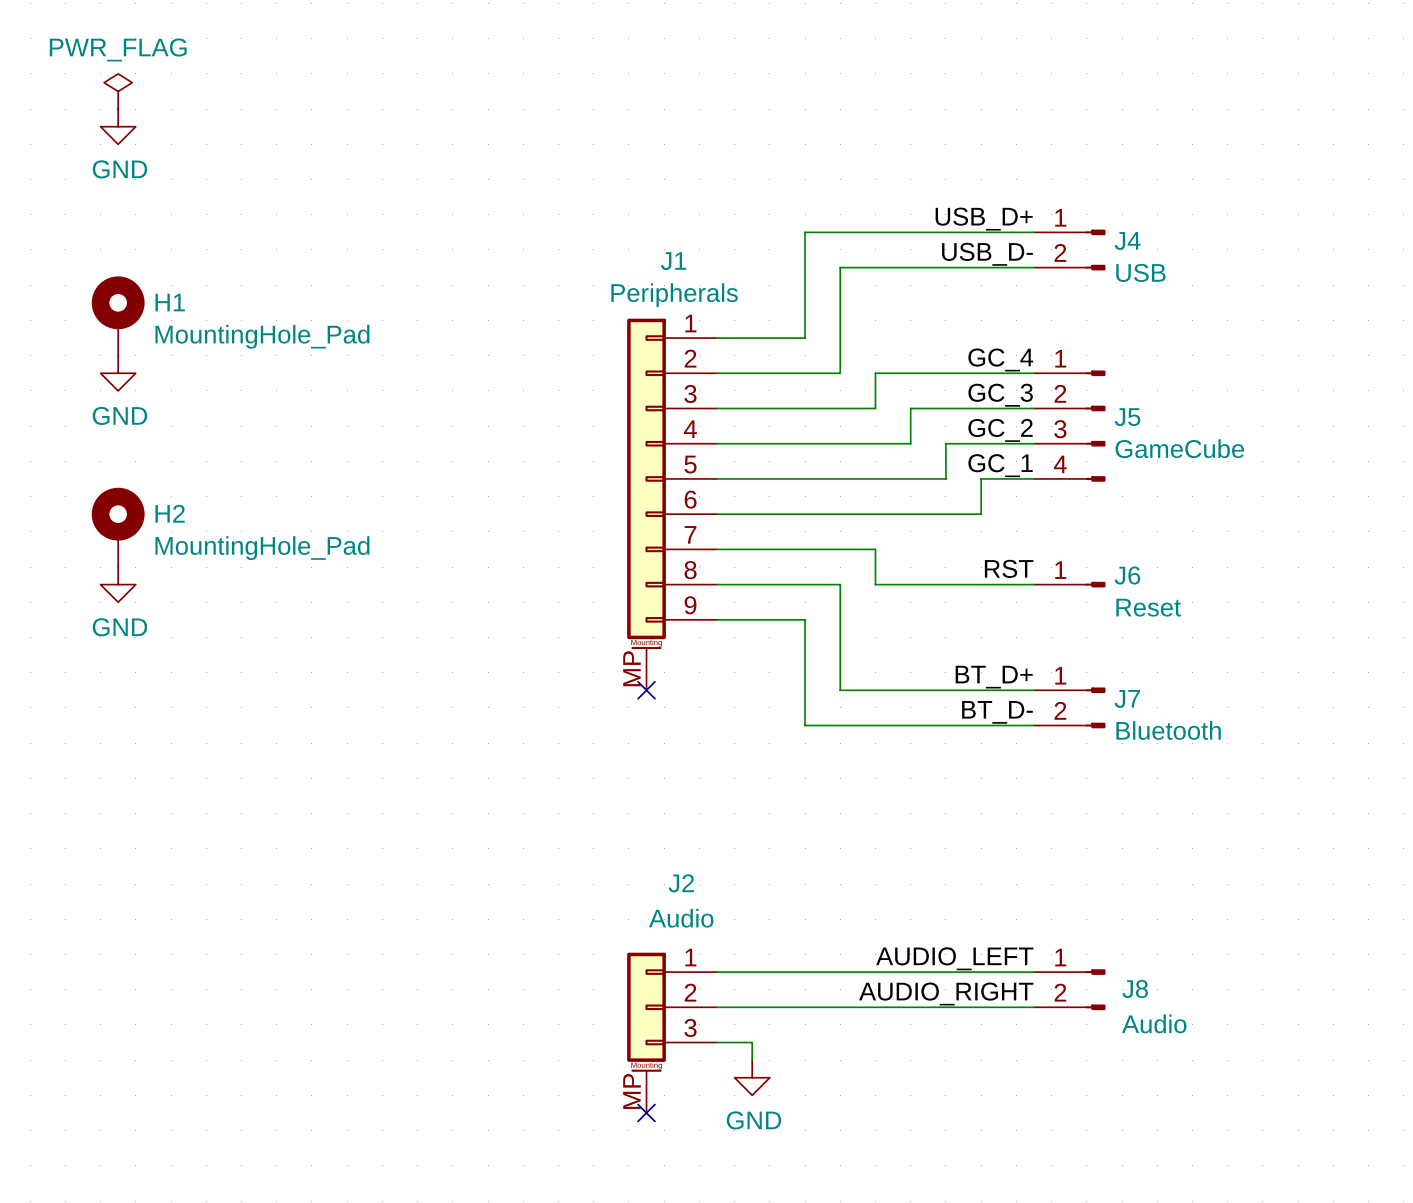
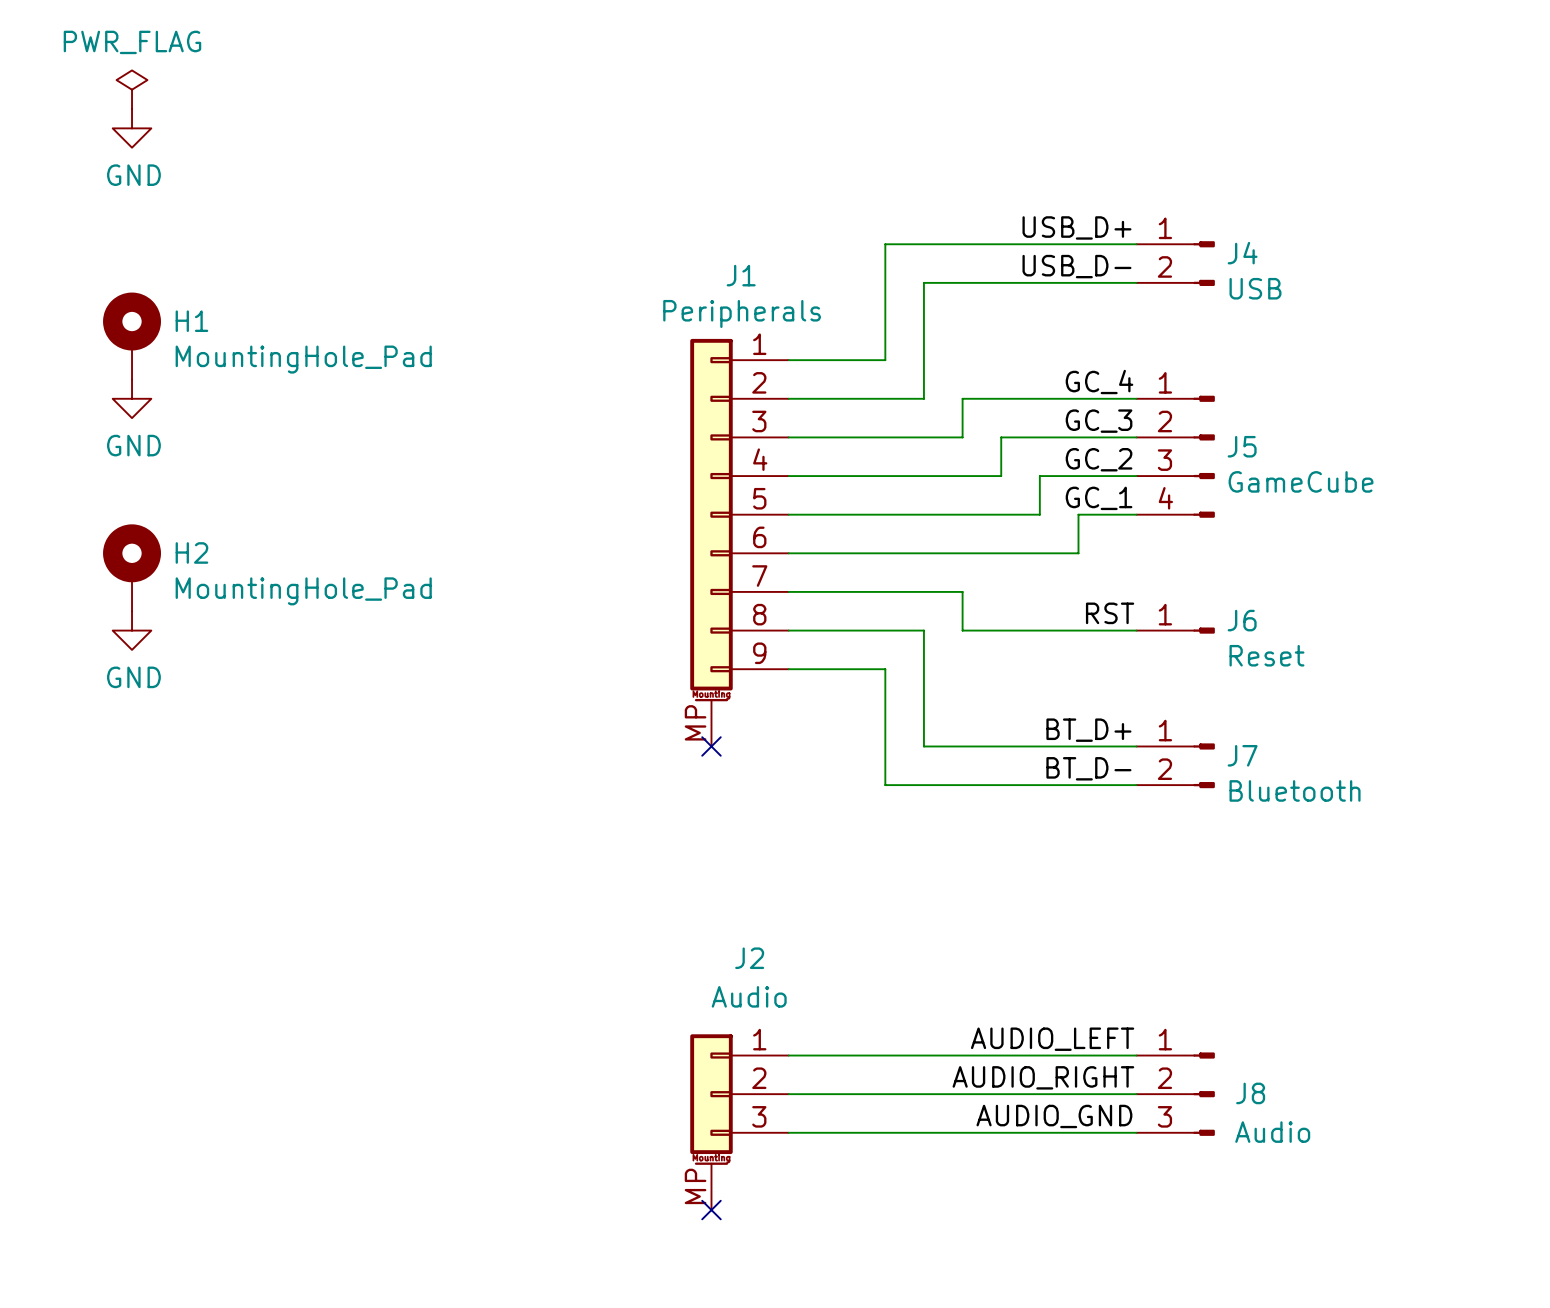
J8 symbol: [1033, 969, 1106, 1011] -> [1136, 1052, 1215, 1136]
label: none -> AUDIO_GND (1054, 1116)
wire: (752, 1042) (752, 1060) -> (827, 1132) (1136, 1132)
power symbol: GND (752, 1077) -> none

